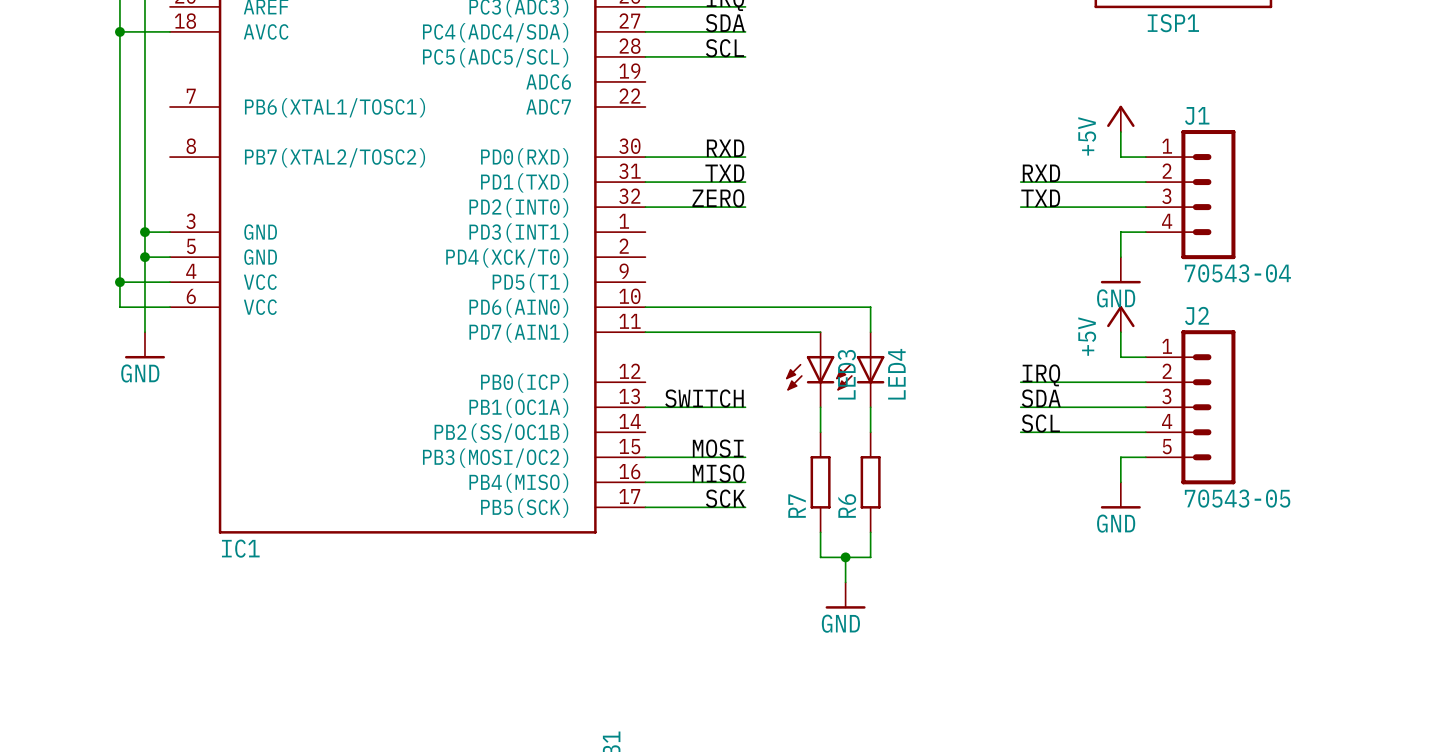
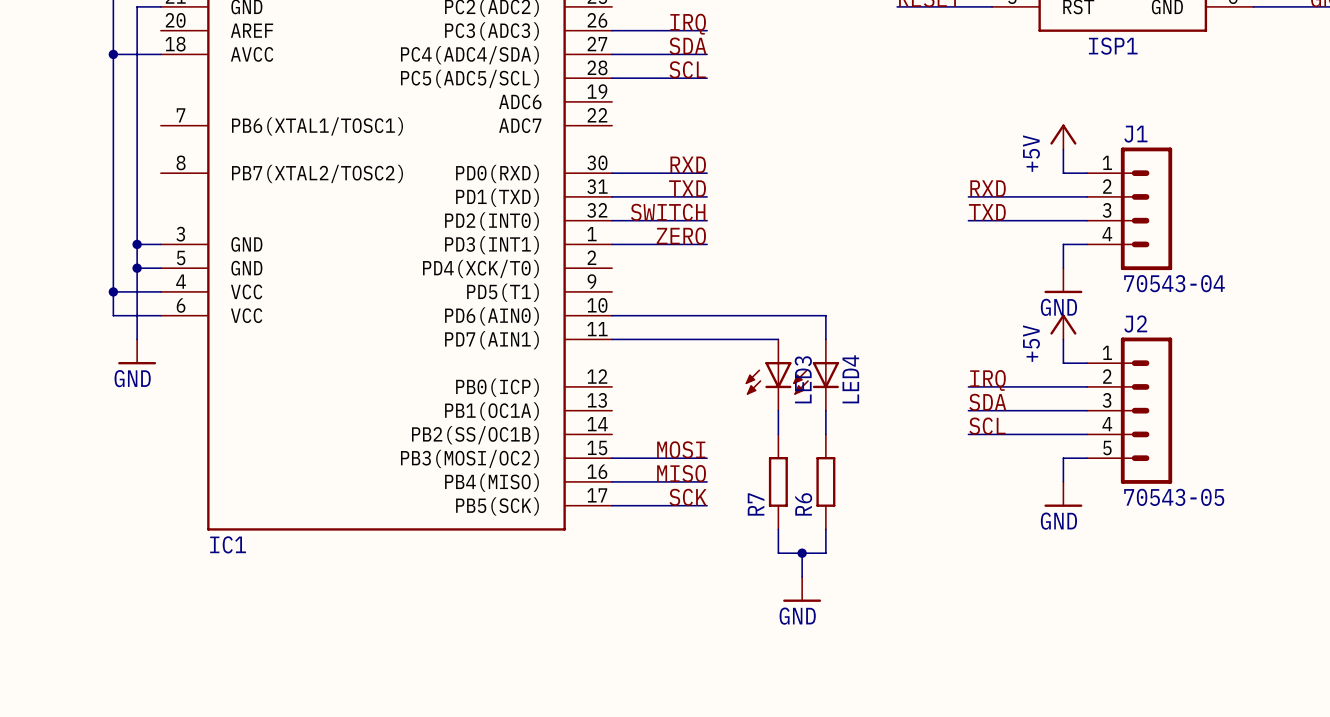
label: ZERO (718, 198) -> SWITCH (668, 212)
label: none -> ZERO (681, 236)
label: SWITCH (704, 398) -> none
wire: (645, 407) (745, 407) -> (612, 244) (707, 244)

